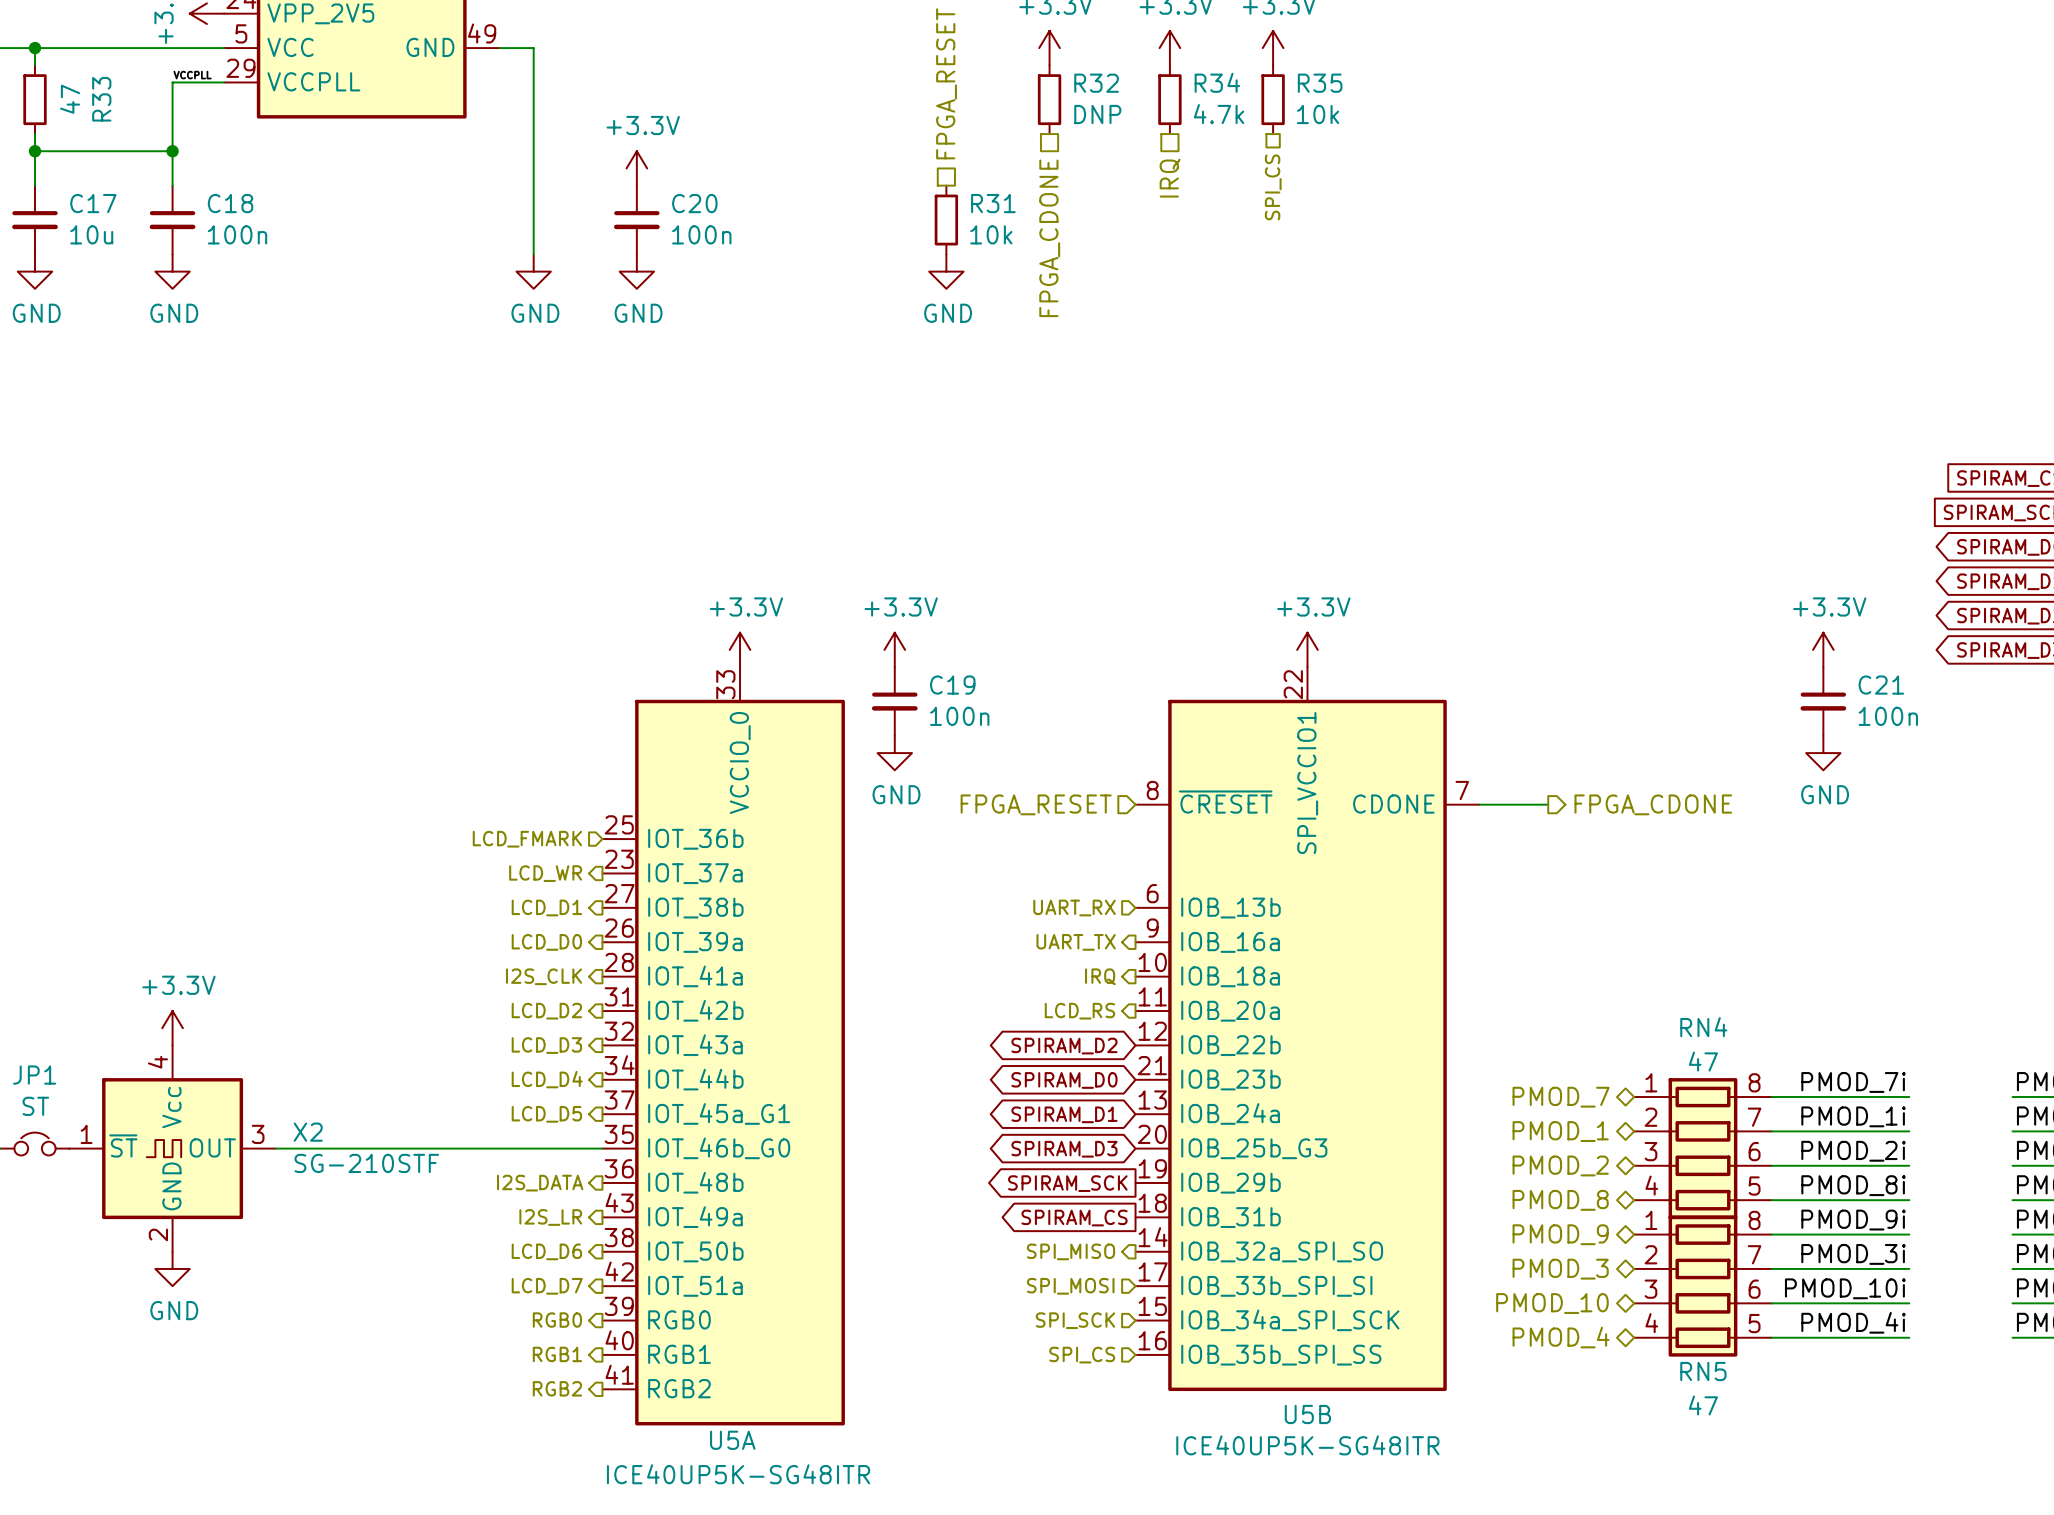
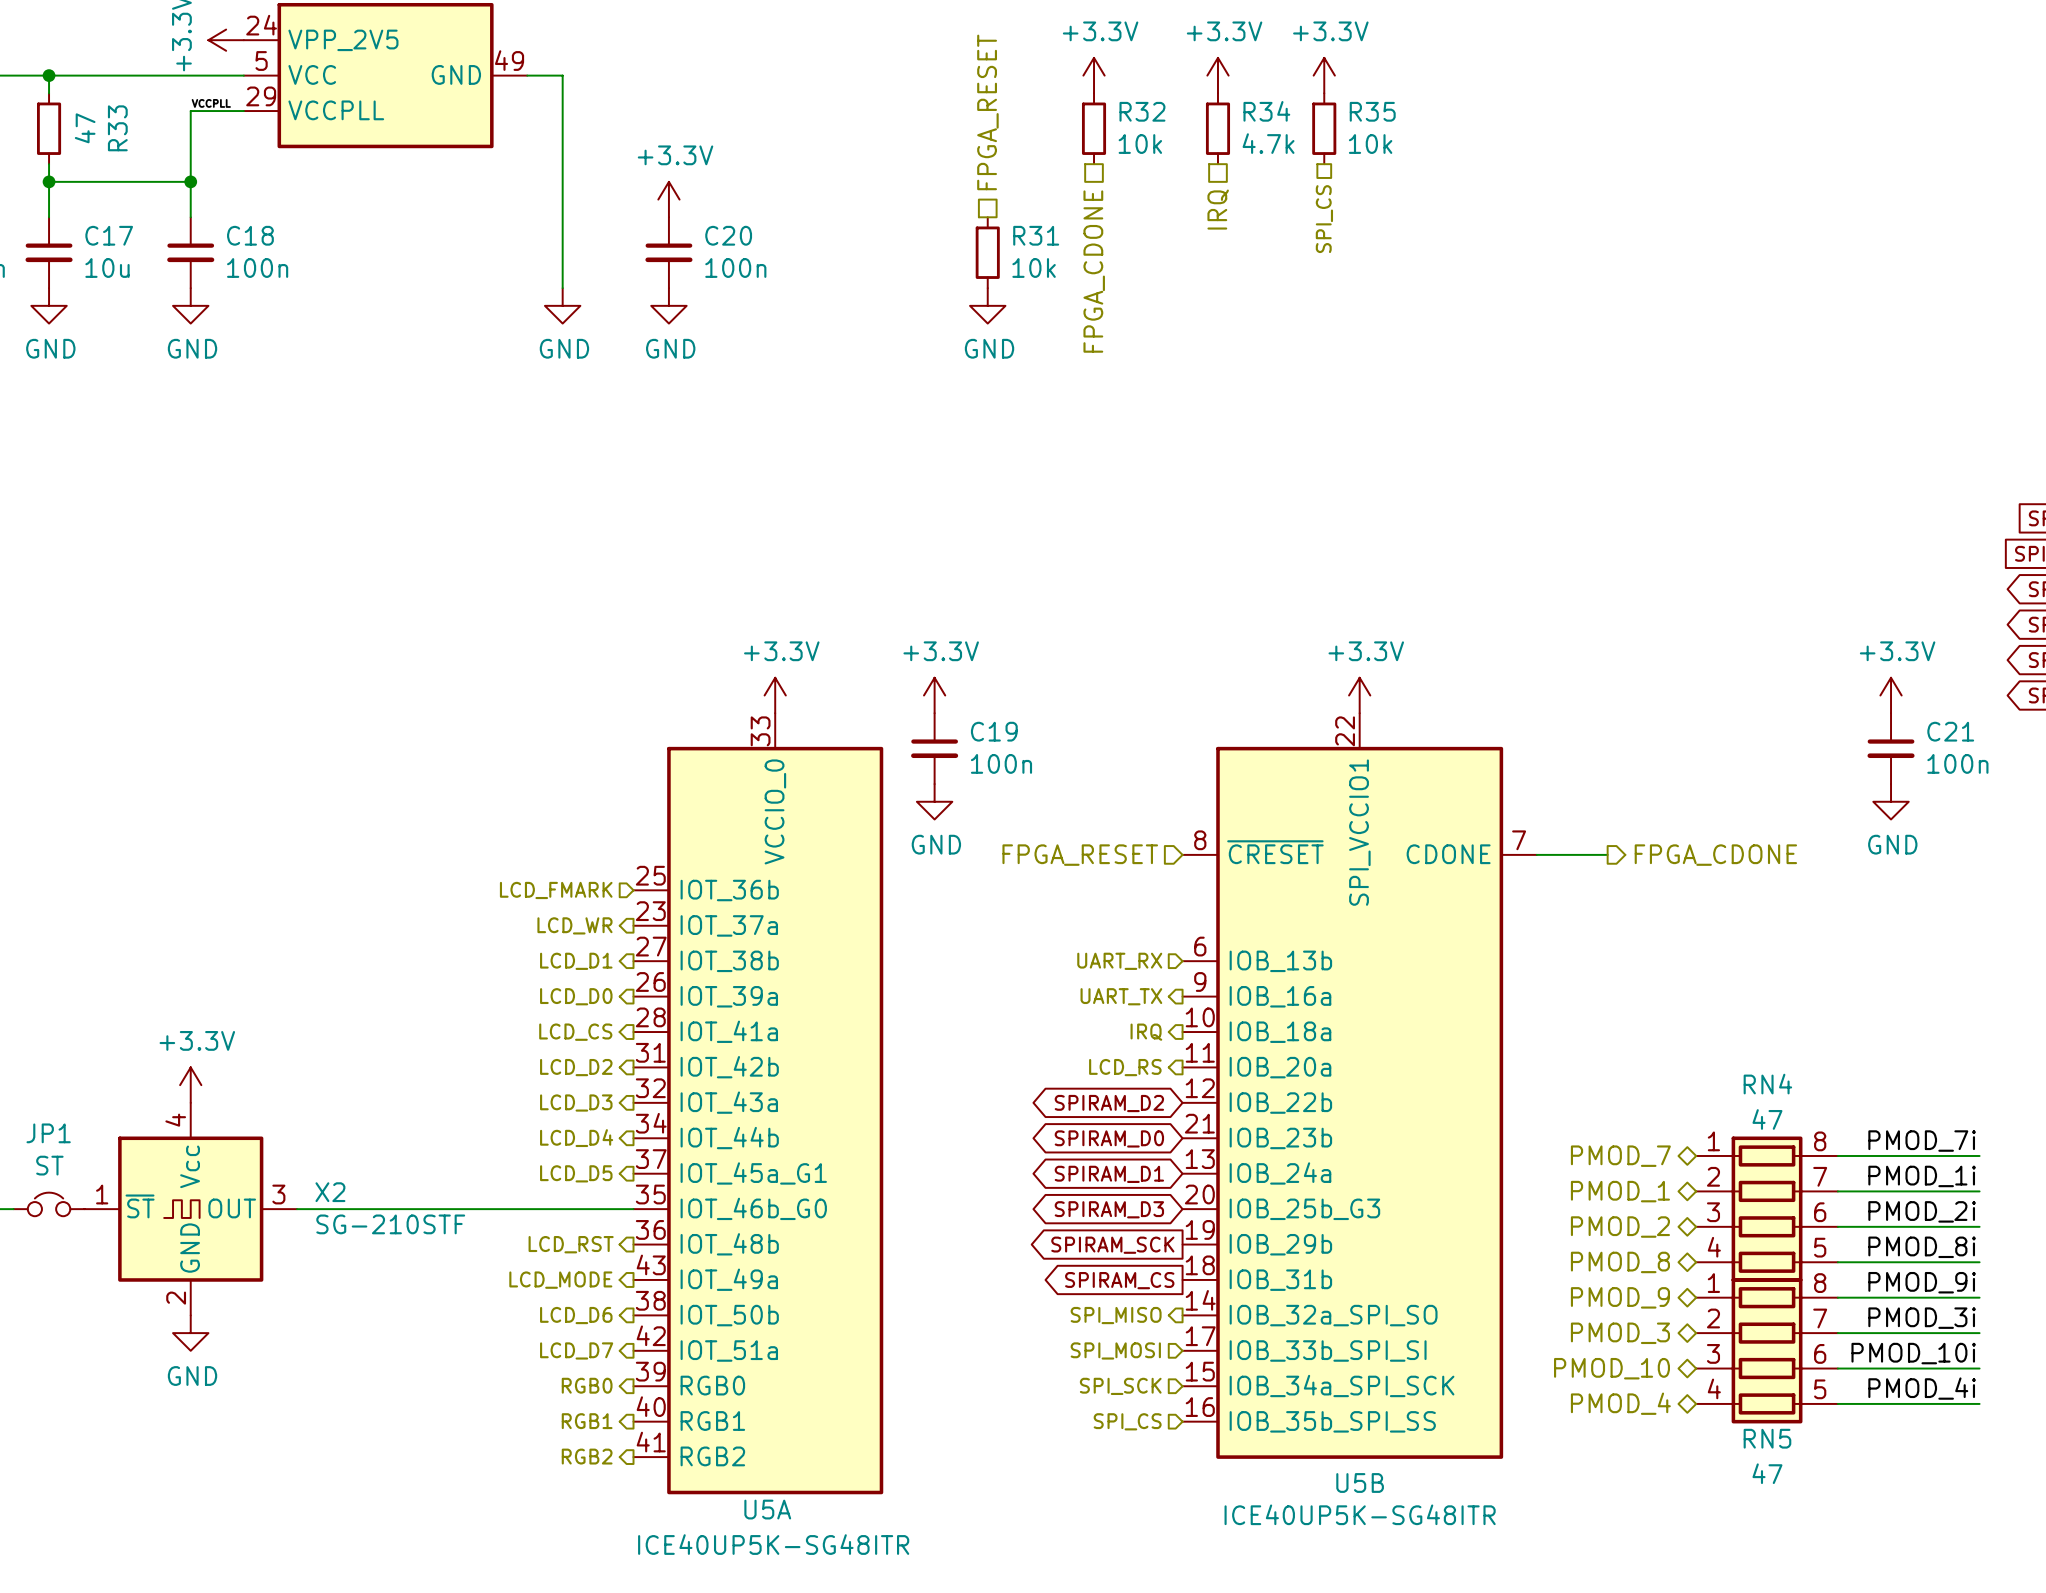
R32 value: DNP (1097, 114) -> 10k (1140, 144)
hierarchical label: I2S_CLK (544, 976) -> LCD_CS (575, 1032)
hierarchical label: I2S_DATA (540, 1183) -> LCD_RST (571, 1244)
hierarchical label: I2S_LR (550, 1217) -> LCD_MODE (560, 1280)

